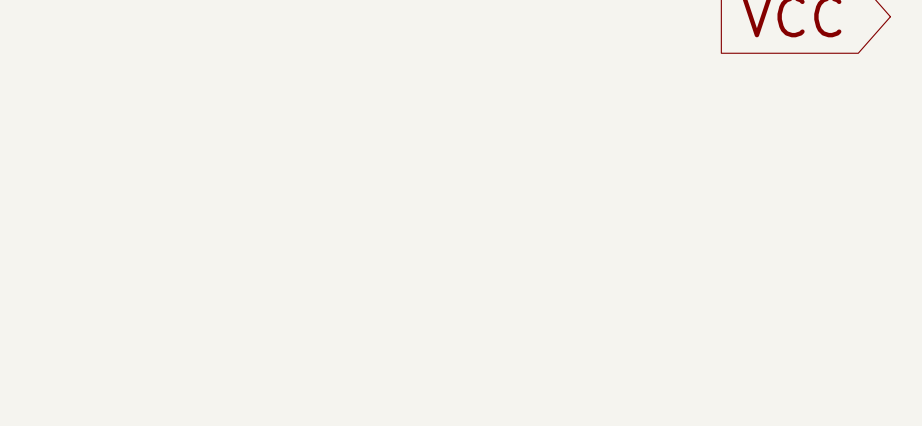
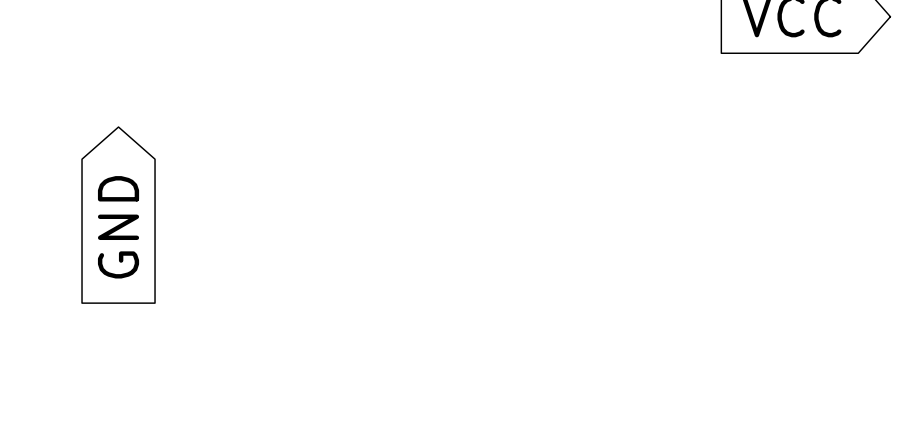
global label: none -> GND (118, 227)

